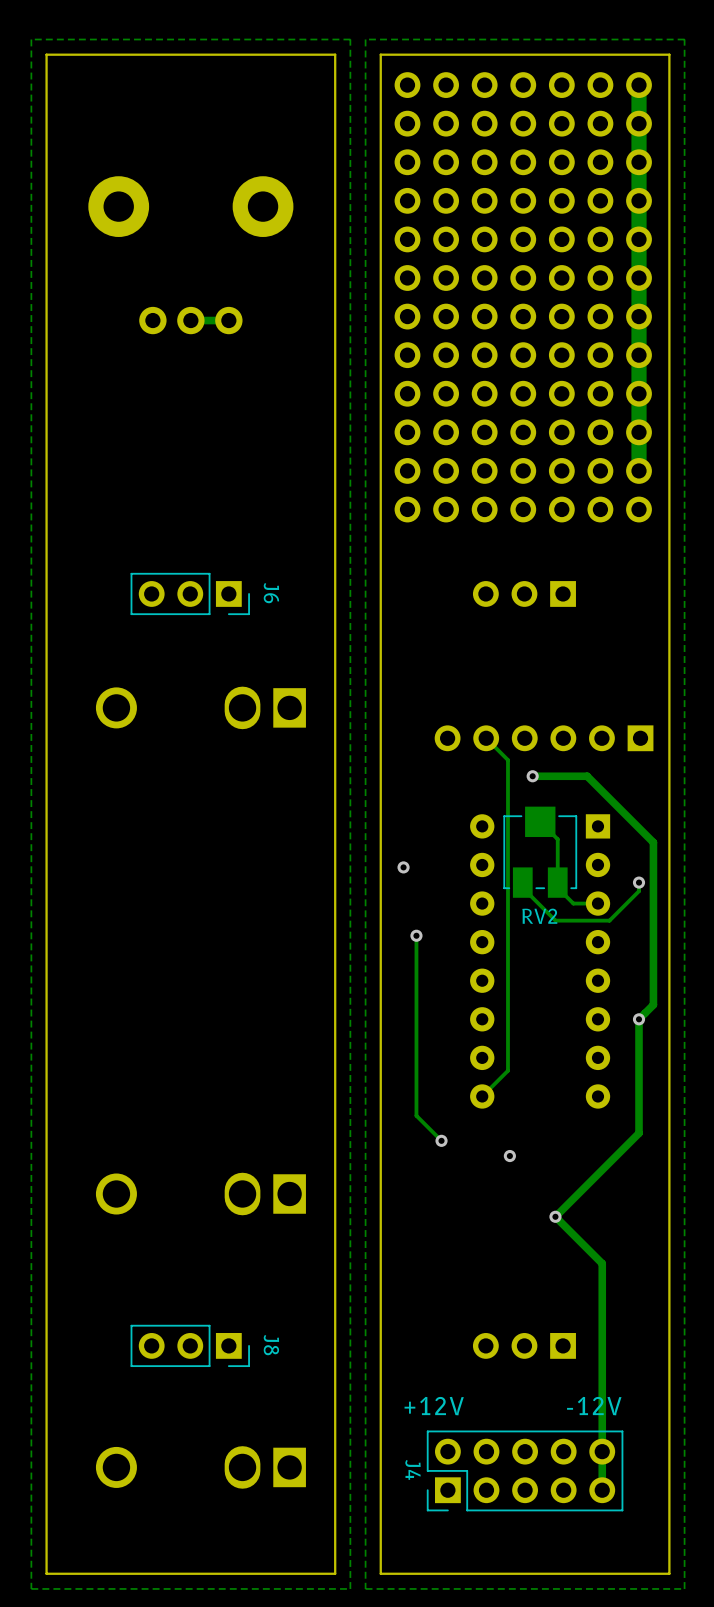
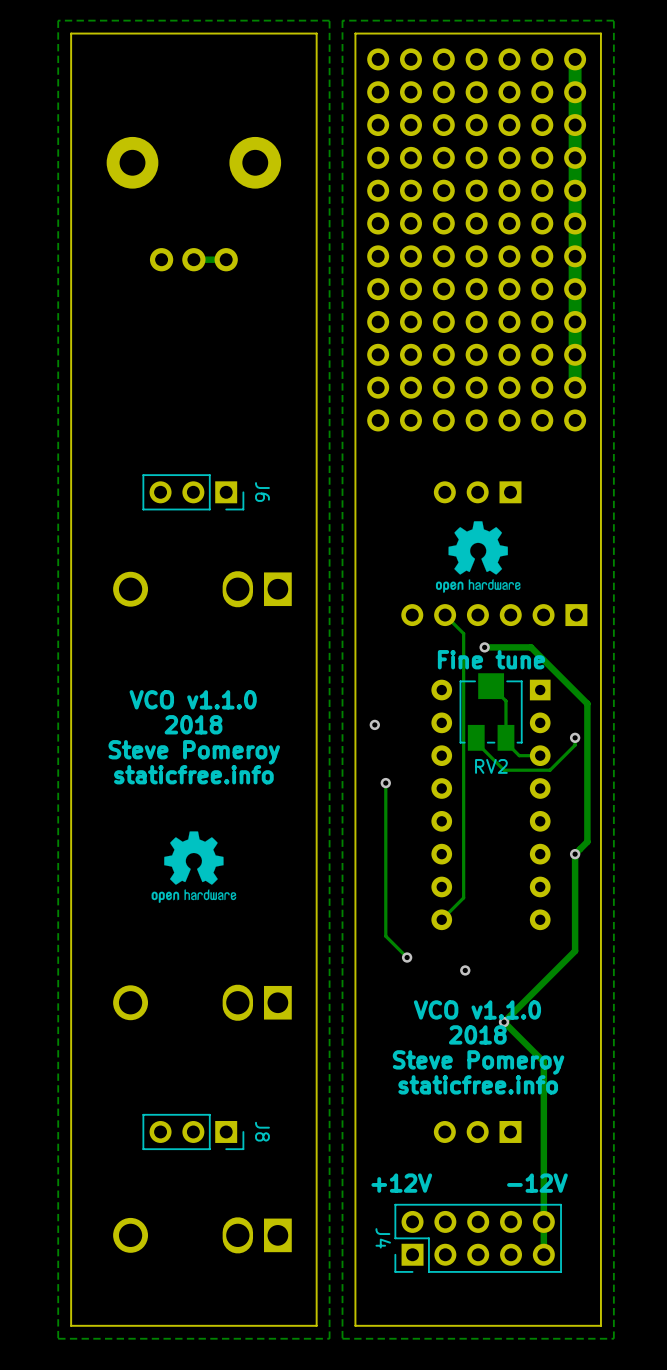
drawing: none -> [435, 521, 521, 593]
text: none -> Fine tune (491, 659)
text: none -> VCO v1.1.0 (193, 699)
text: none -> 2018 (193, 724)
text: none -> Steve Pomeroy (194, 752)
text: none -> staticfree.info (193, 774)
drawing: none -> [151, 831, 237, 903]
text: none -> VCO v1.1.0 (477, 1009)
text: none -> 2018 (477, 1034)
text: none -> Steve Pomeroy (478, 1062)
text: none -> staticfree.info (478, 1084)

